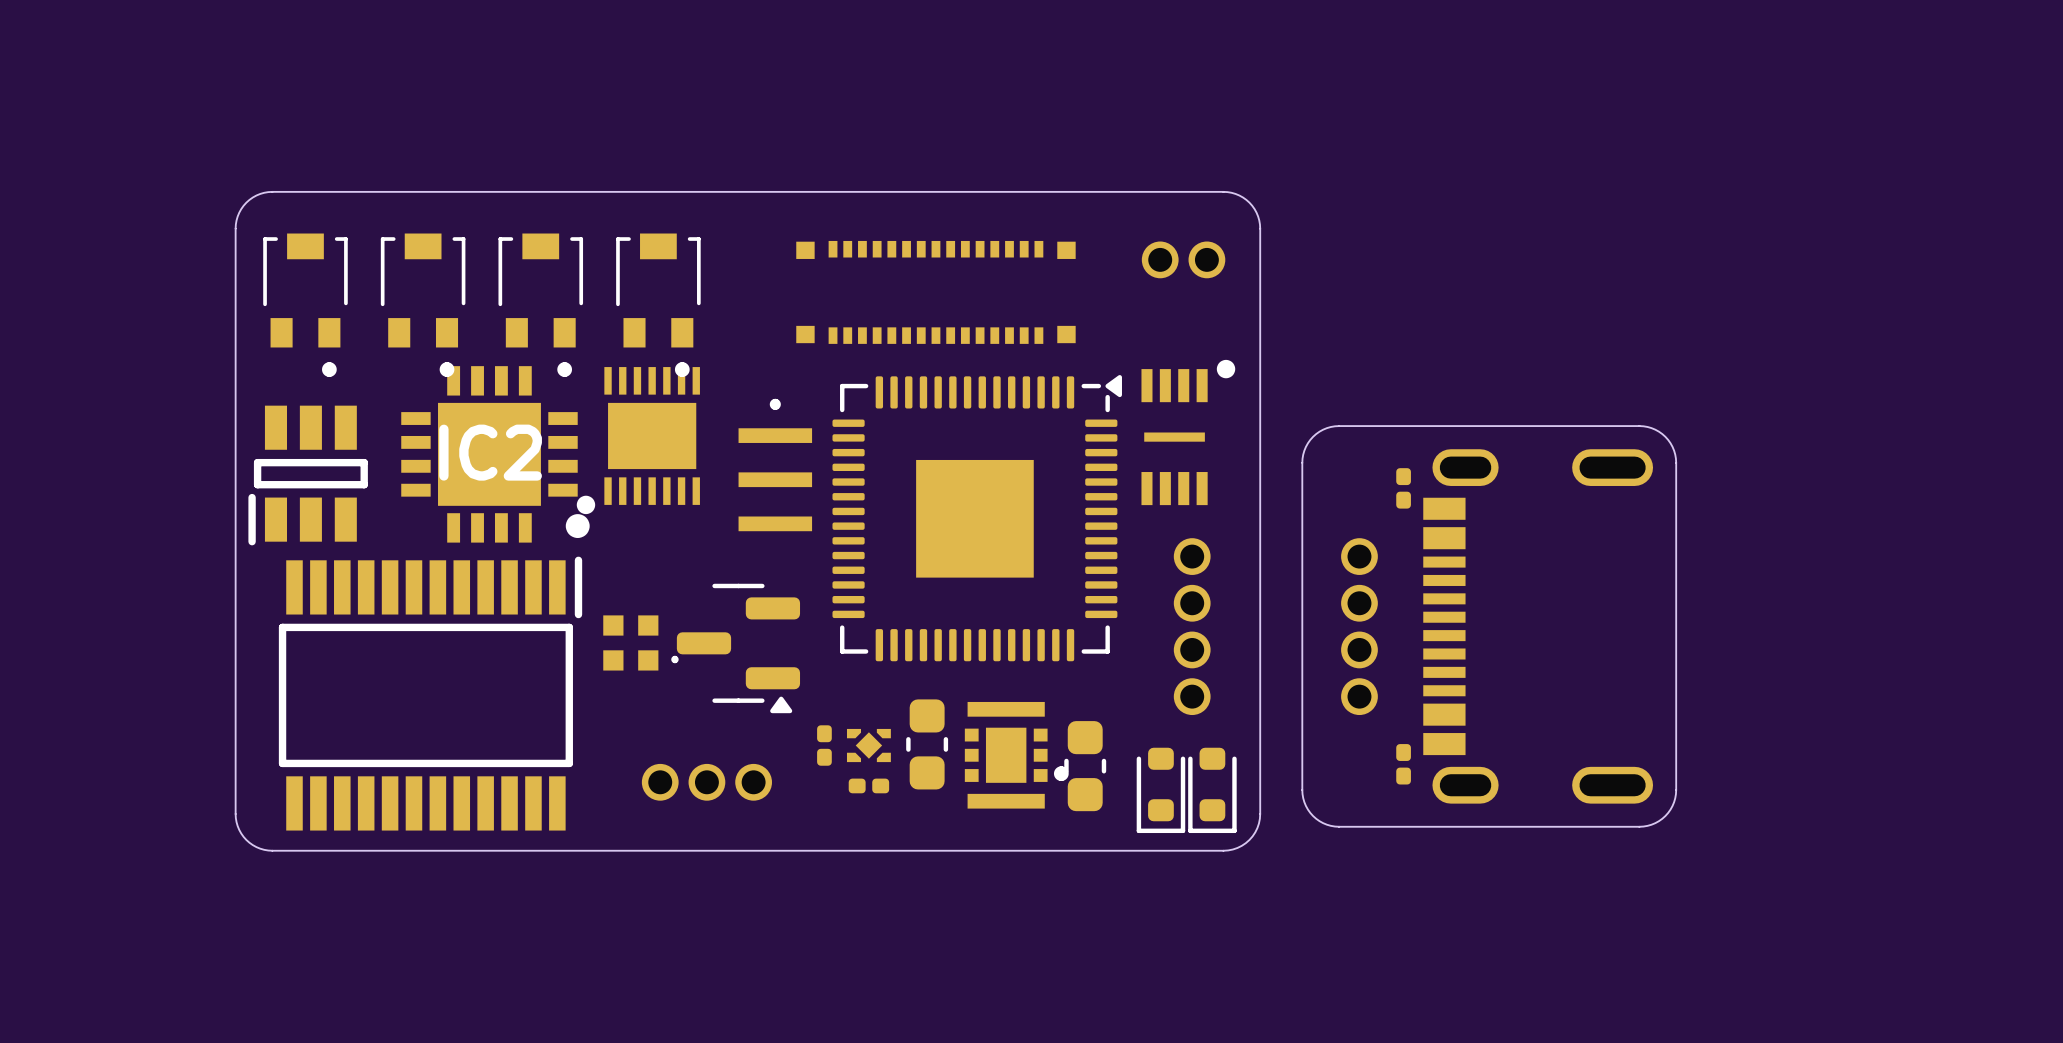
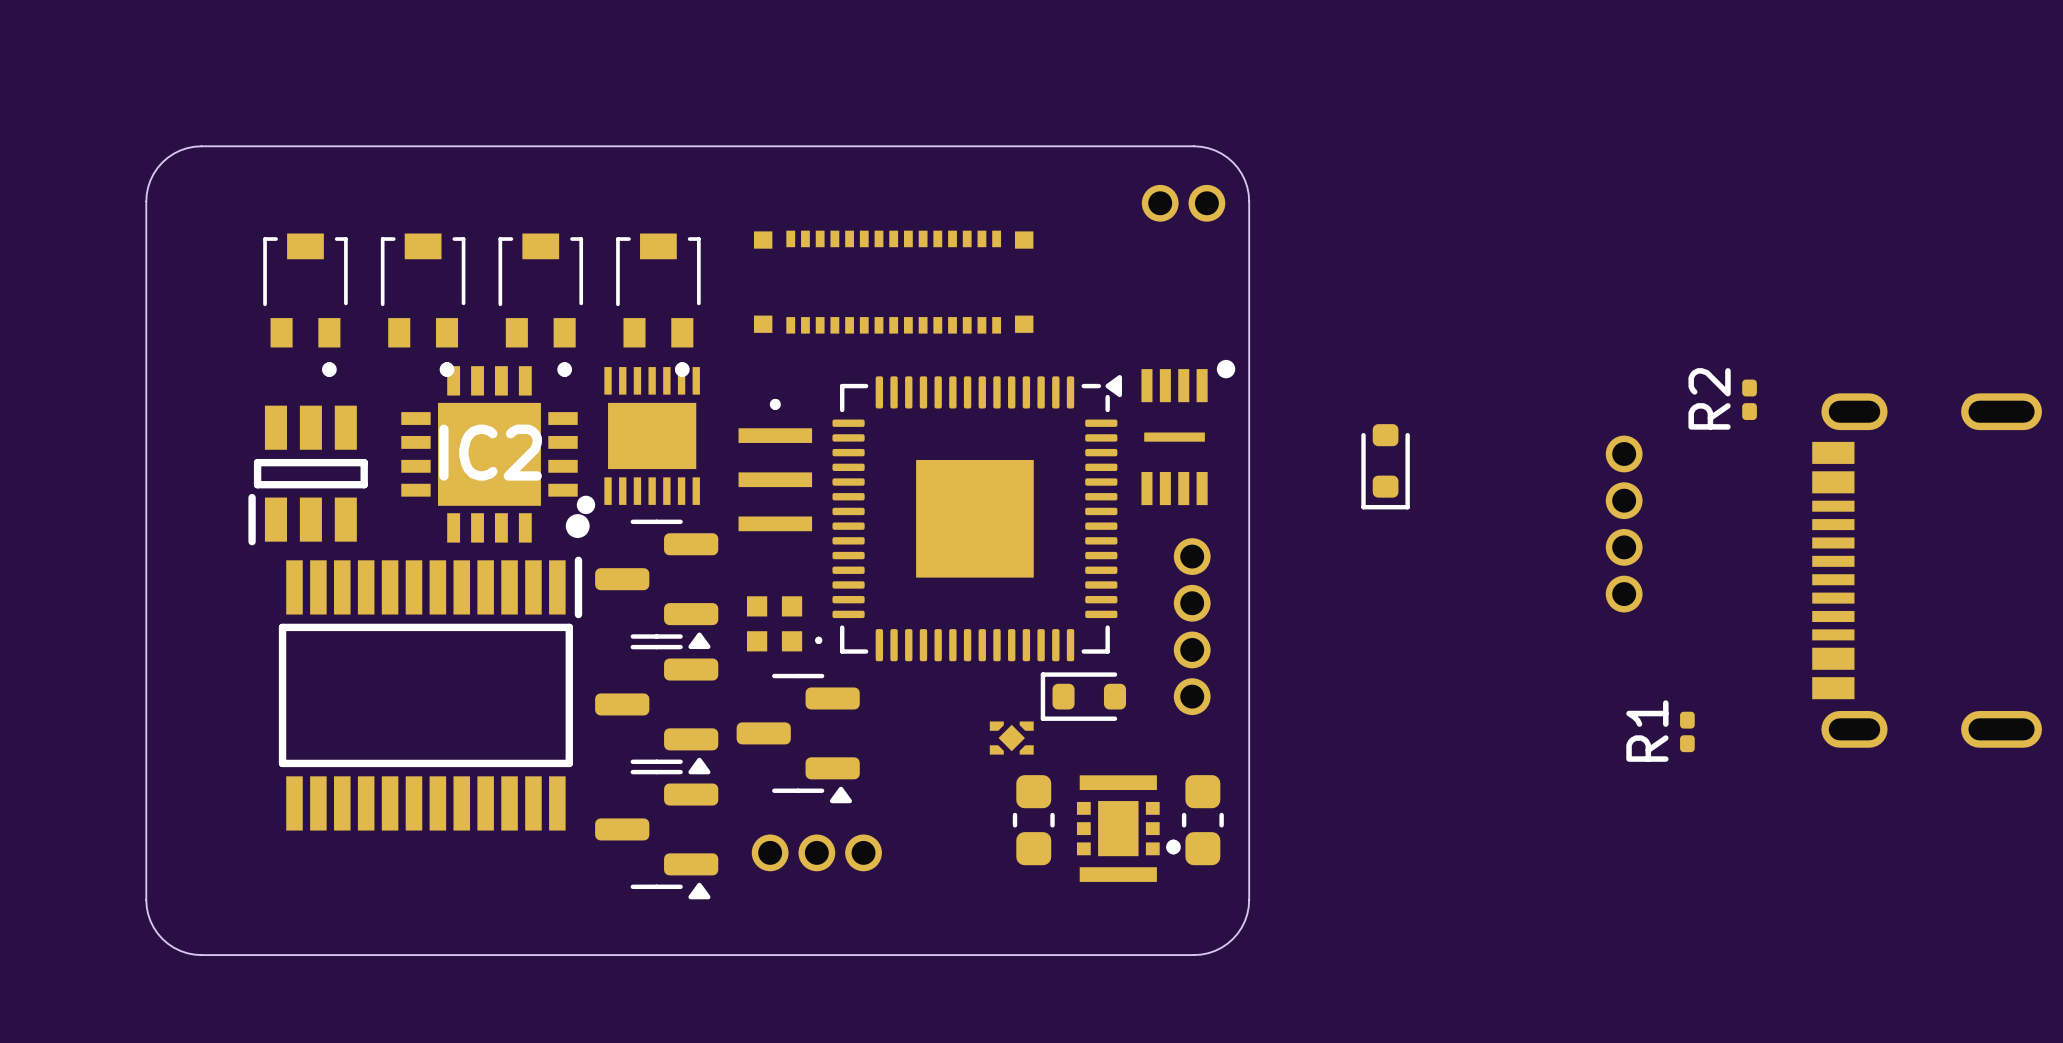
board edge: (272, 191) (1223, 191) (1243, 197) (1254, 209) (1260, 228) (1260, 813) (1255, 832) (1241, 845) (1223, 850) (272, 850) (252, 845) (241, 833) (235, 813) (235, 228) (239, 212) (246, 202) (260, 193) (272, 191) -> (201, 146) (180, 150) (162, 162) (150, 180) (146, 201) (146, 899) (150, 921) (157, 933) (167, 943) (180, 950) (201, 955) (1194, 955) (1215, 950) (1227, 943) (1237, 933) (1244, 921) (1249, 899) (1249, 201) (1247, 187) (1241, 173) (1227, 157) (1215, 150) (1194, 146) (201, 146)
part position: (1183, 259) -> (1183, 203)
part position: (935, 292) -> (893, 282)
R2: none -> (1749, 399)
board edge: (1339, 426) (1639, 426) (1655, 429) (1668, 439) (1674, 450) (1676, 462) (1676, 790) (1672, 805) (1662, 818) (1651, 824) (1639, 826) (1339, 826) (1323, 823) (1310, 812) (1304, 802) (1302, 790) (1302, 458) (1307, 443) (1316, 434) (1326, 428) (1339, 426) -> none
part footprint: [1396, 468, 1411, 509] -> [1361, 424, 1410, 510]
part: none -> (656, 584)
part position: (1359, 626) -> (1624, 524)
part position: (1538, 626) -> (1927, 570)
part position: (640, 642) -> (784, 623)
part: (738, 648) -> none
part: none -> (1083, 696)
part footprint: [964, 701, 1069, 809] -> [989, 721, 1034, 755]
part: none -> (656, 709)
part footprint: [817, 725, 832, 766] -> [736, 673, 860, 804]
R1: none -> (1687, 731)
part: (927, 744) -> none
part: (868, 745) -> none
part: (1403, 764) -> none
part: (1085, 766) -> none
part position: (706, 782) -> (816, 852)
part: (868, 785) -> none
part: (1160, 790) -> none
part: (1212, 790) -> none
part: none -> (1033, 820)
part: none -> (1202, 820)
part: none -> (1128, 828)
part: none -> (656, 834)

